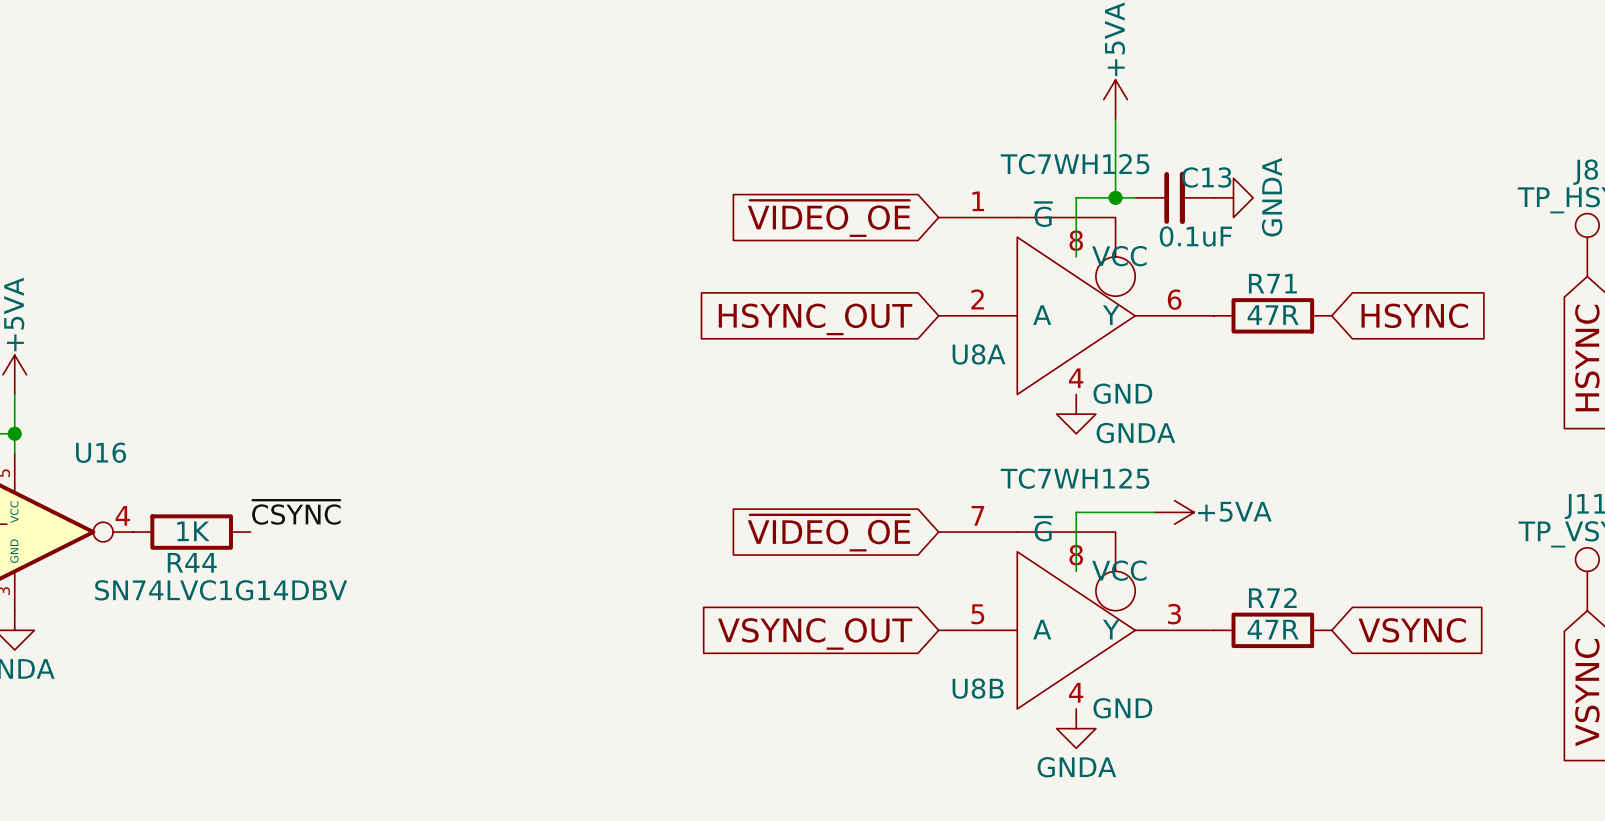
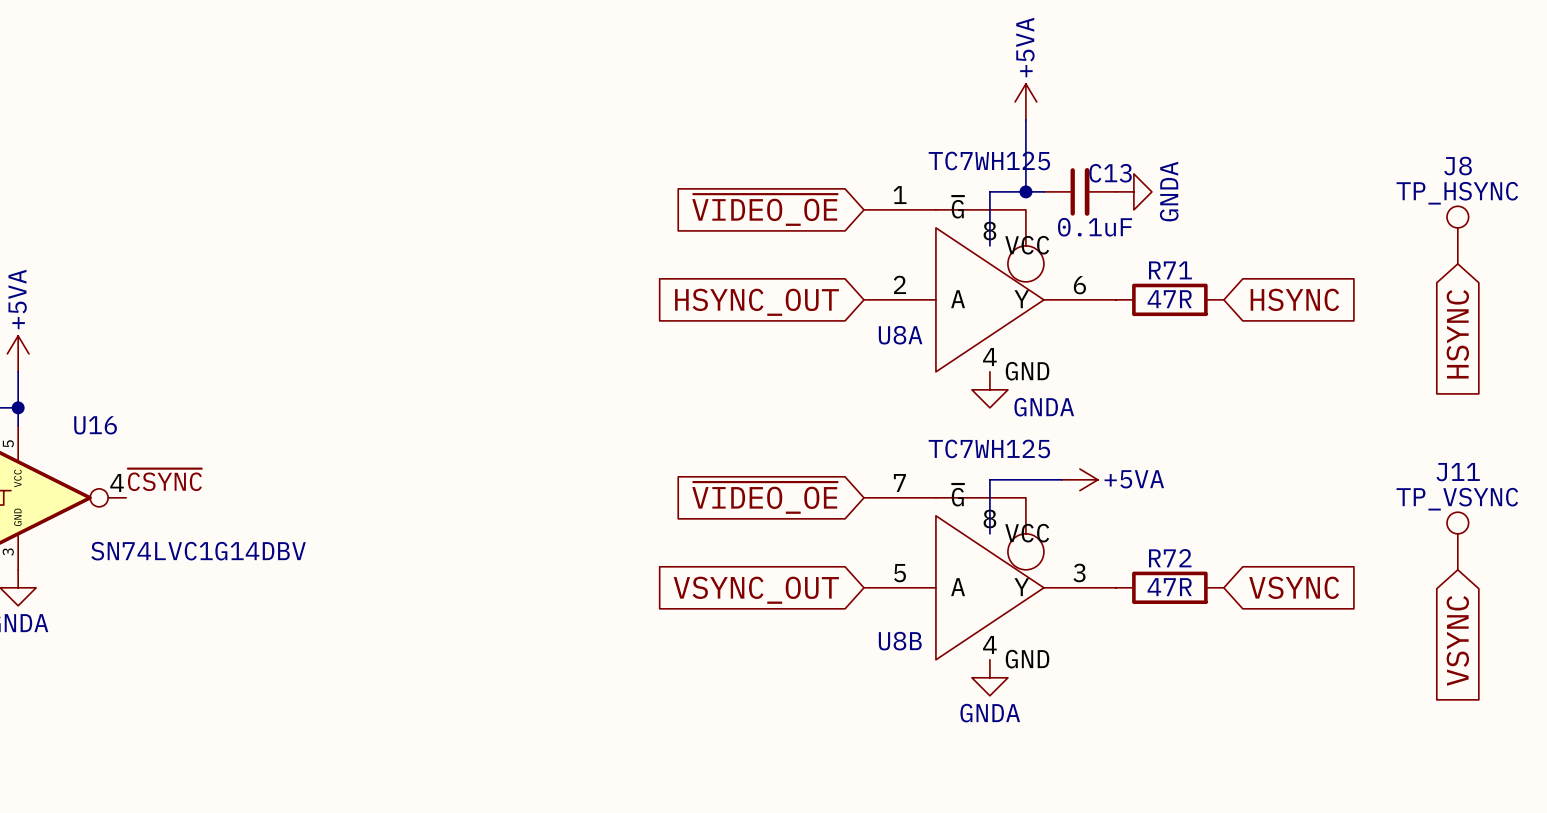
label position: ~{CSYNC} (296, 512) -> ~{CSYNC} (164, 479)
R44: 1K (191, 532) -> none

